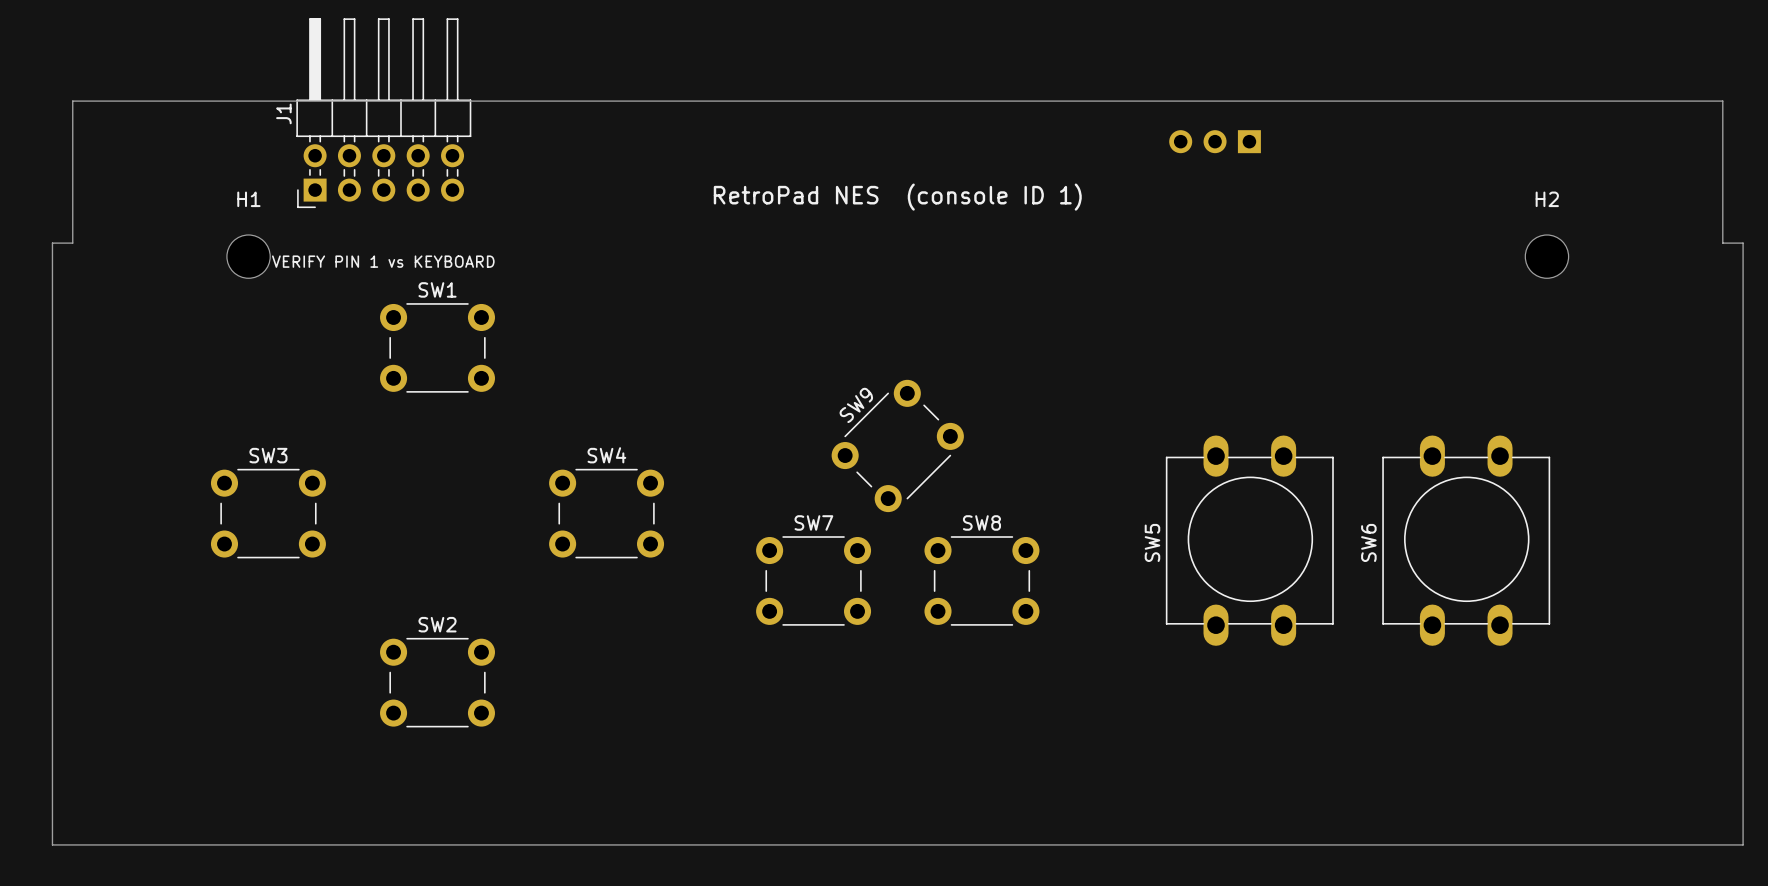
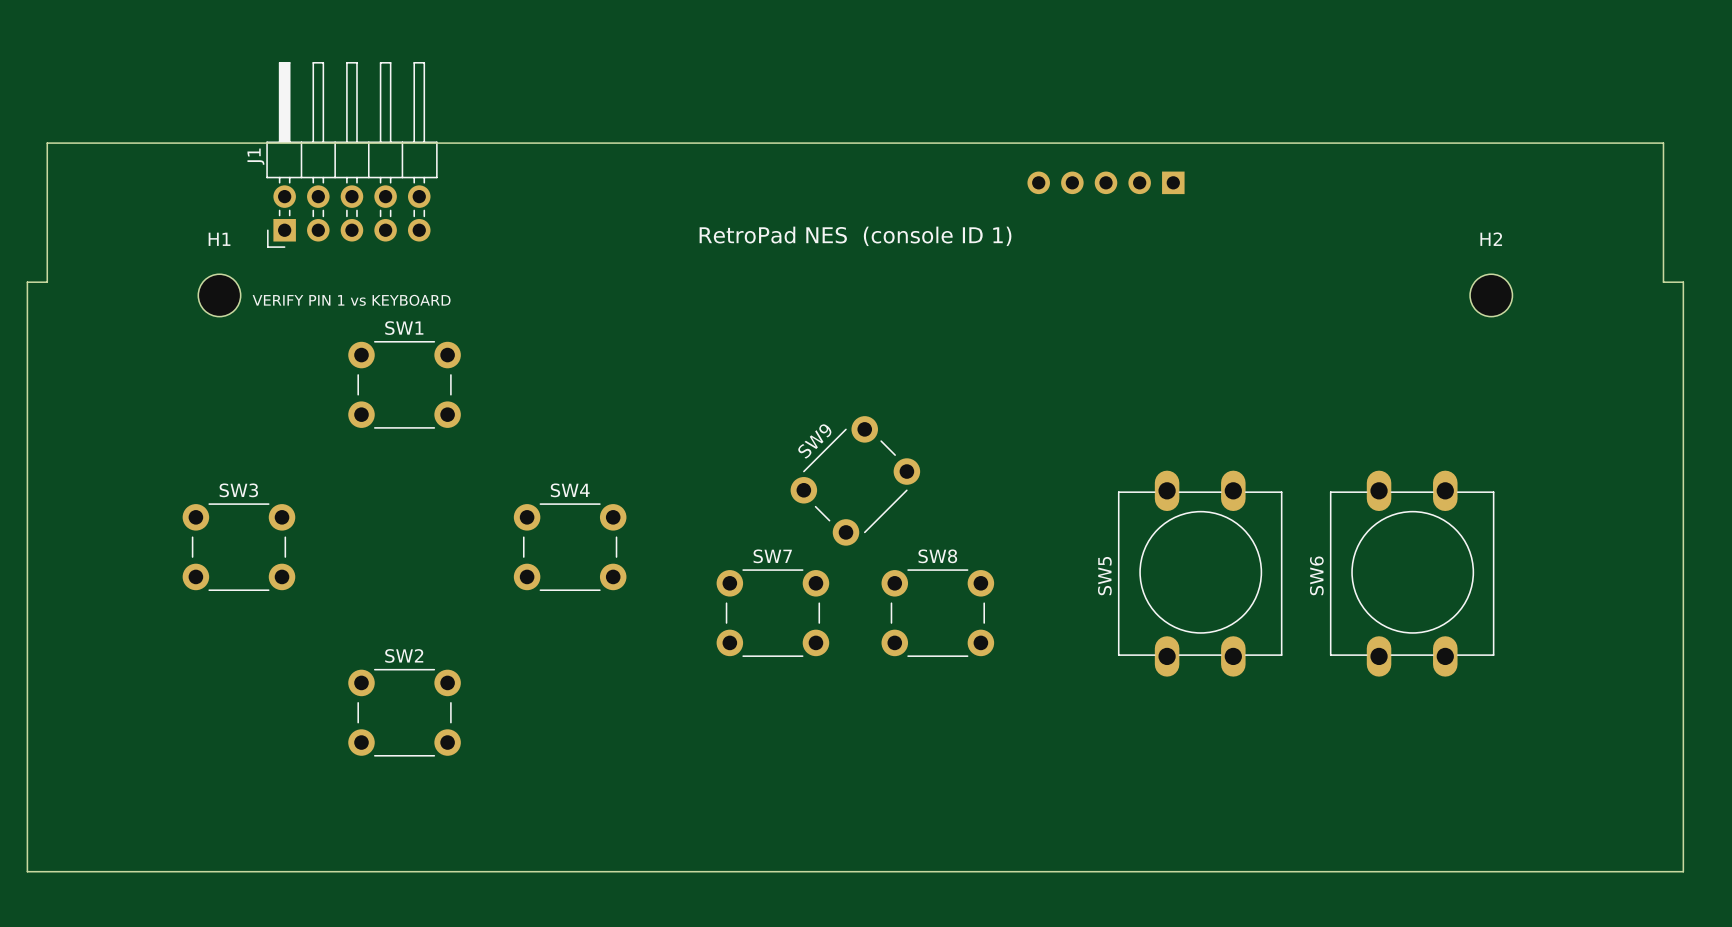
part: none -> (1106, 182)
part: (1215, 141) -> none

